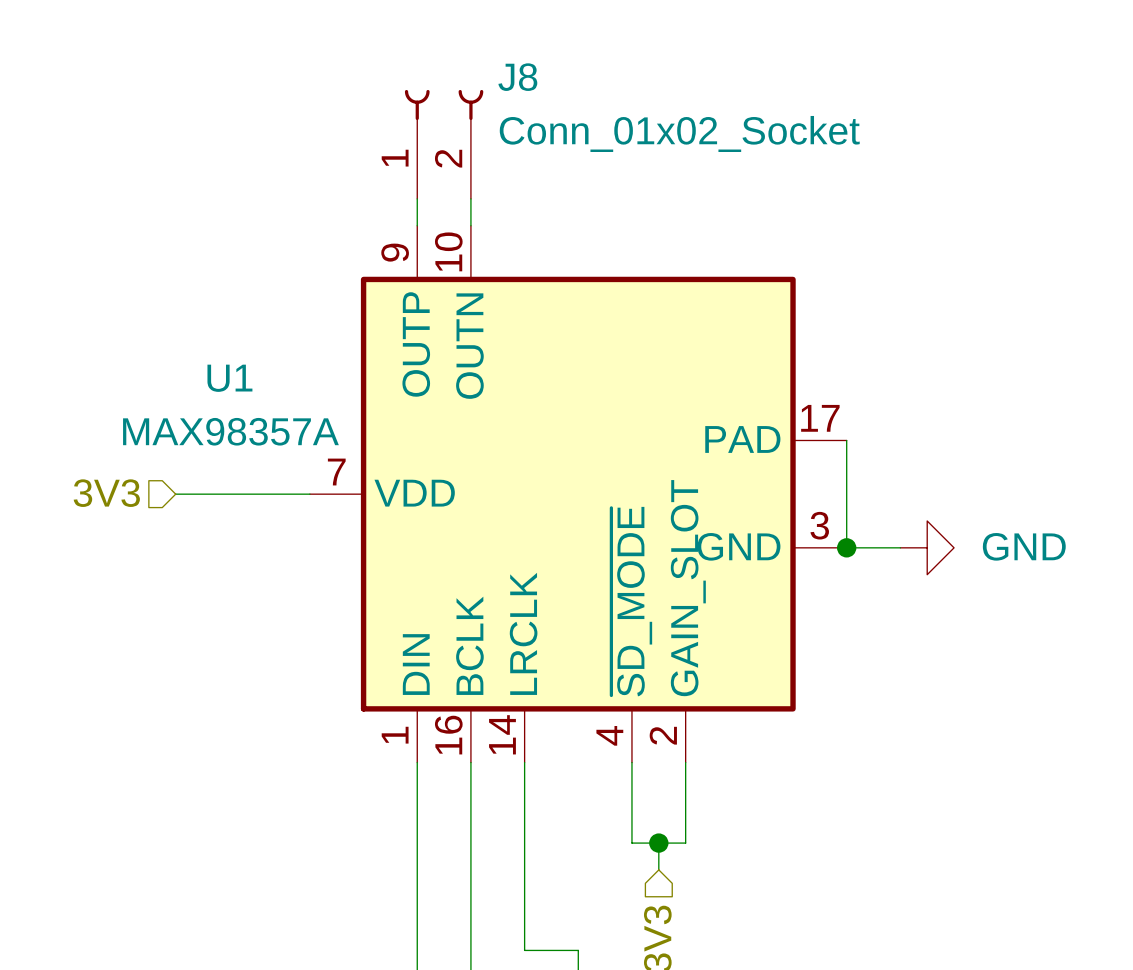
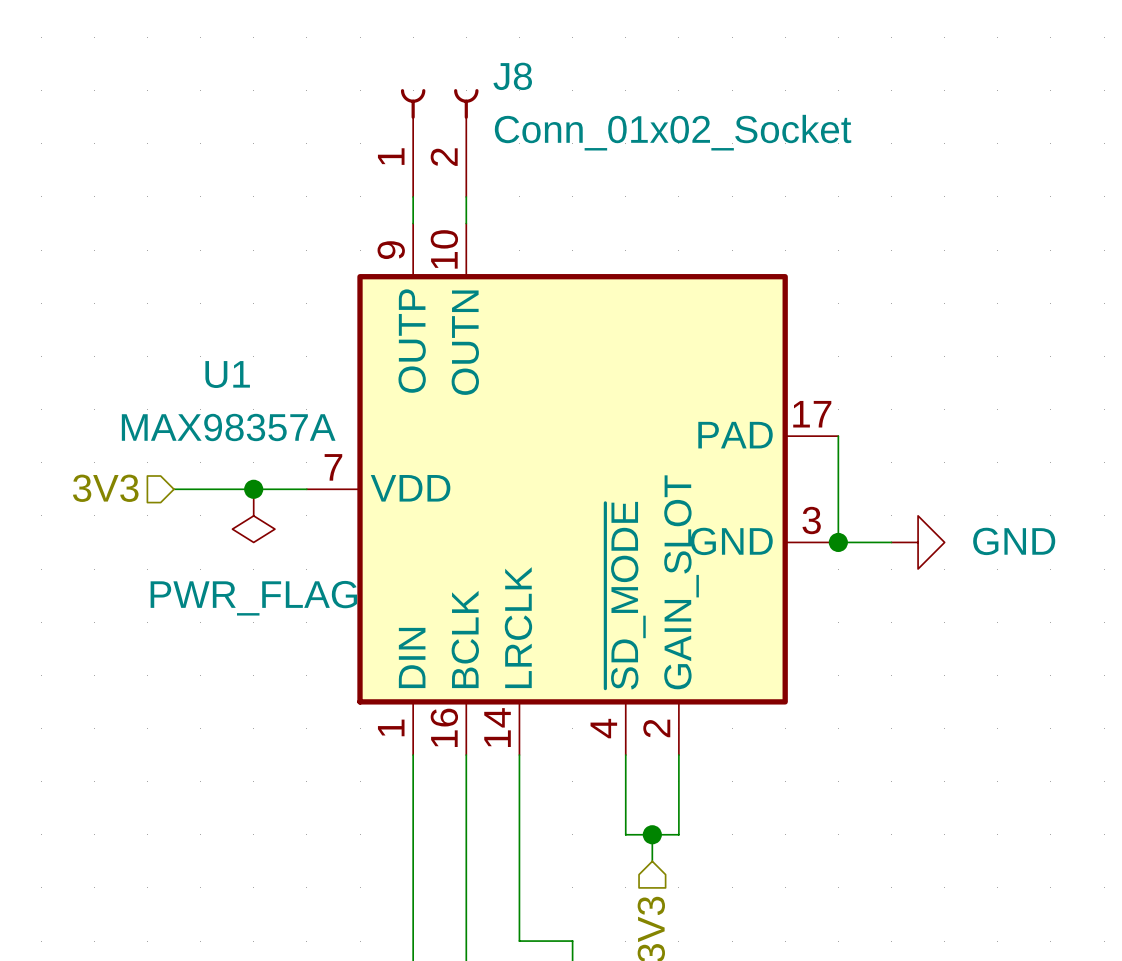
junction: none -> (253, 489)
power symbol: none -> PWR_FLAG (253, 515)

